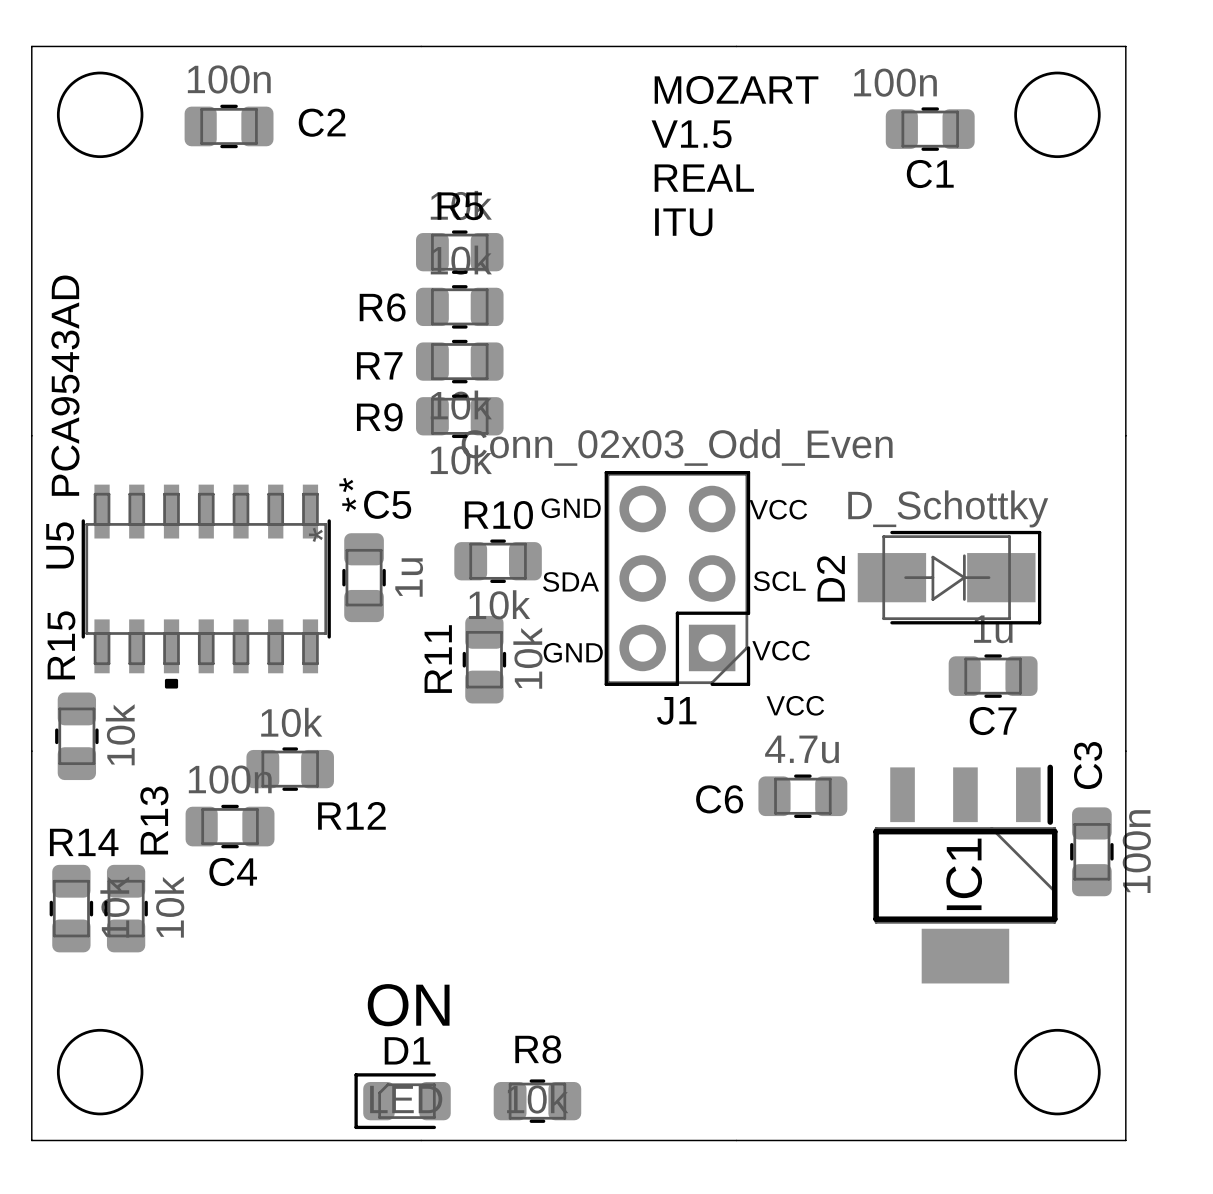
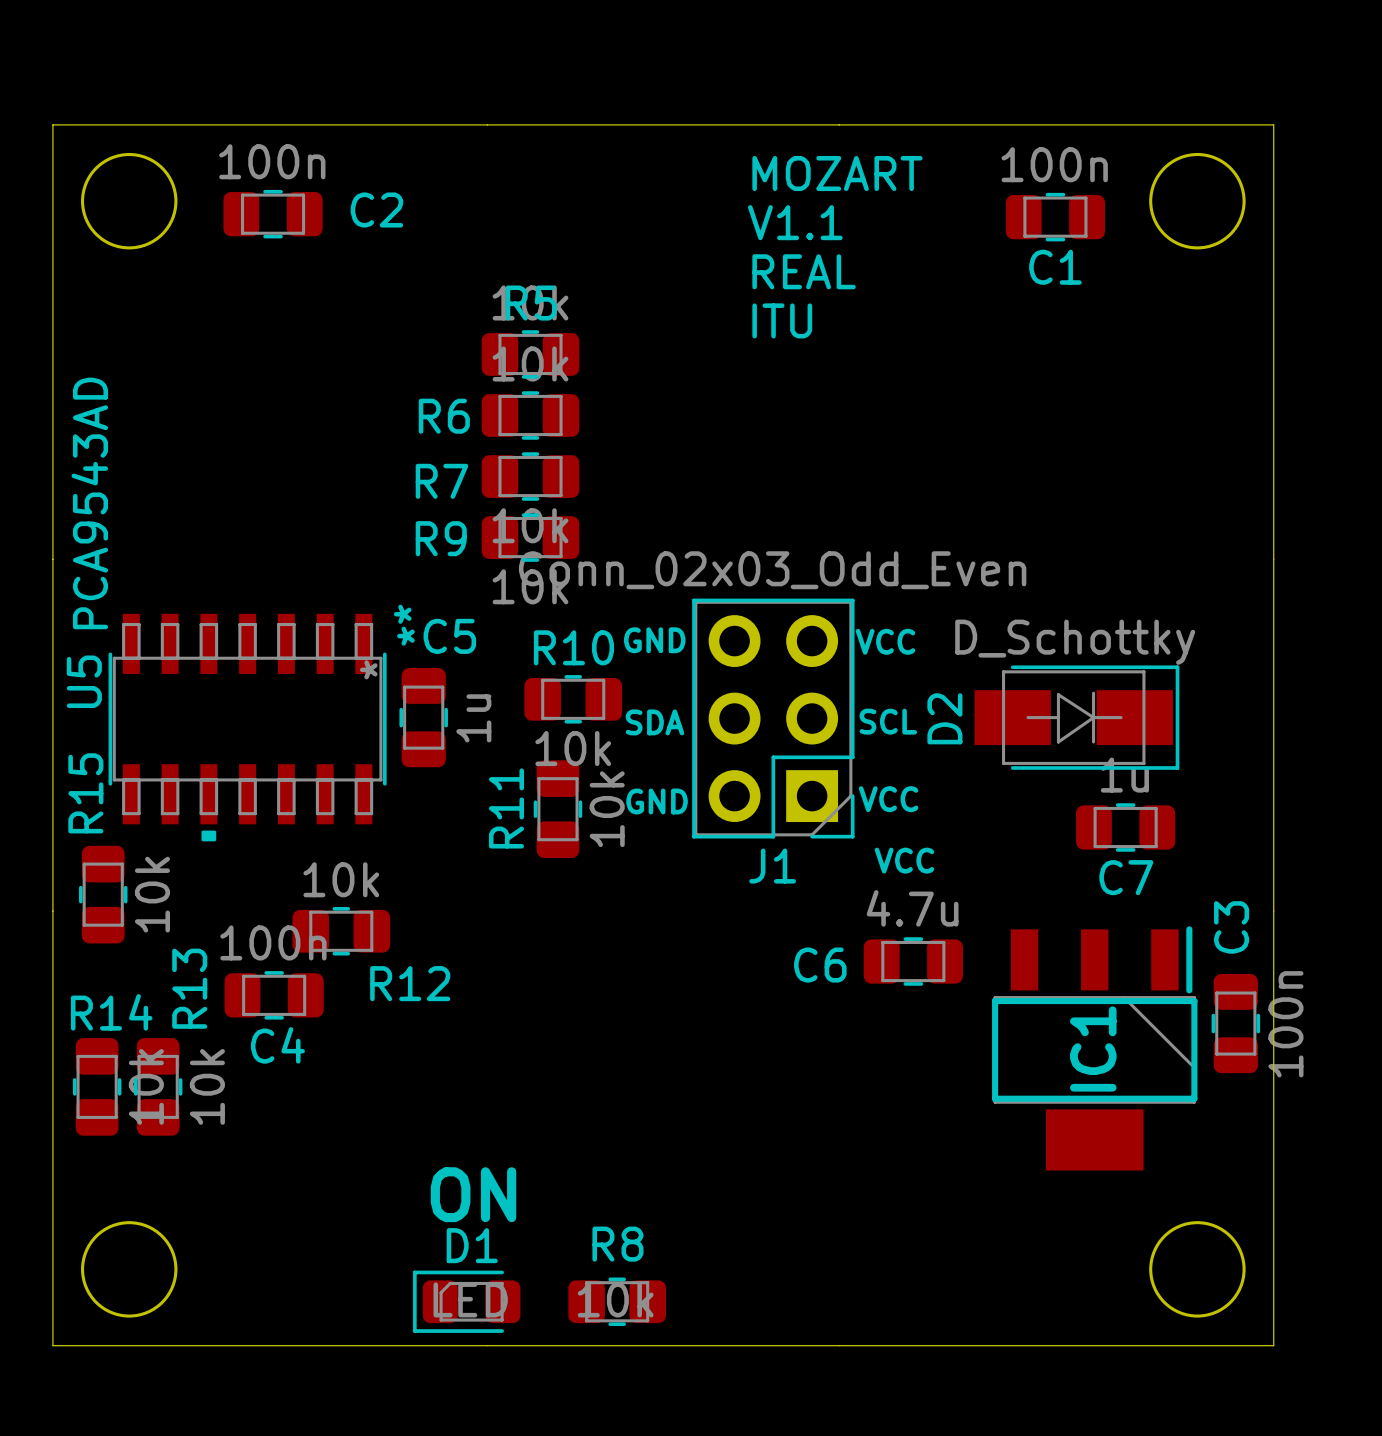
C1 value position: 100n (895, 82) -> 100n (1054, 164)
text: V1.5 (691, 134) -> V1.1 (795, 222)

